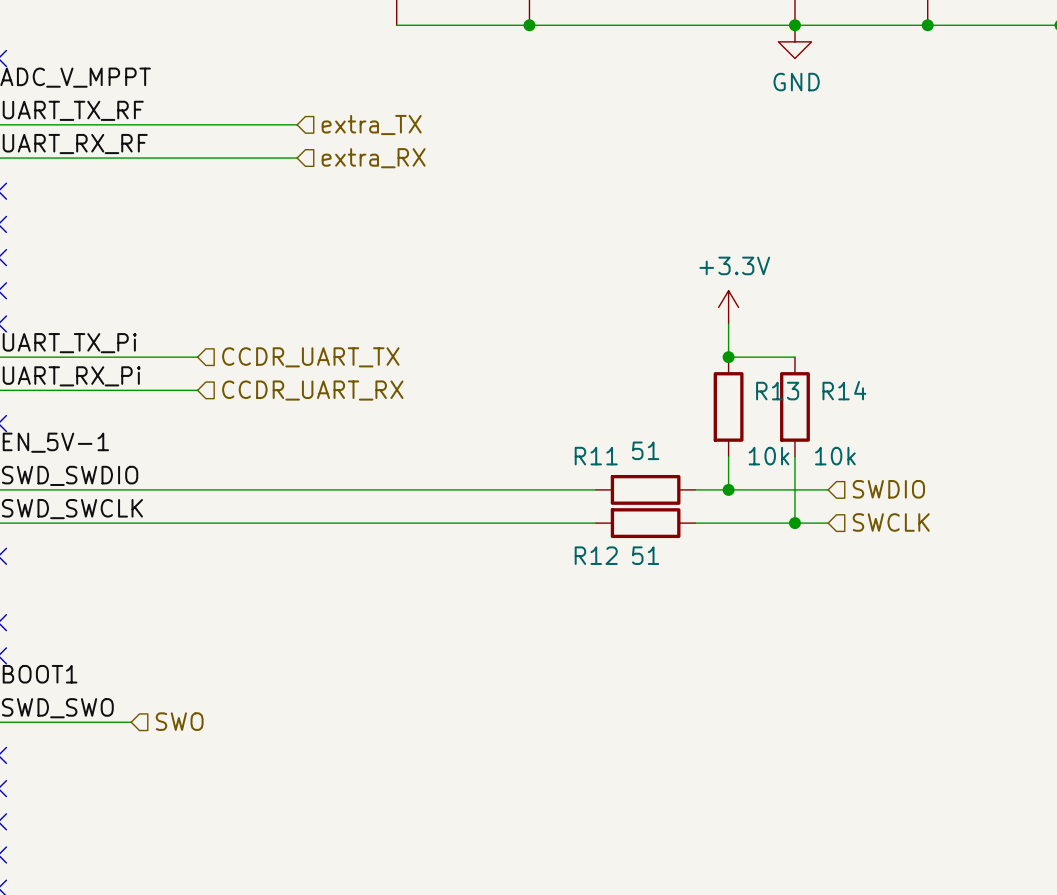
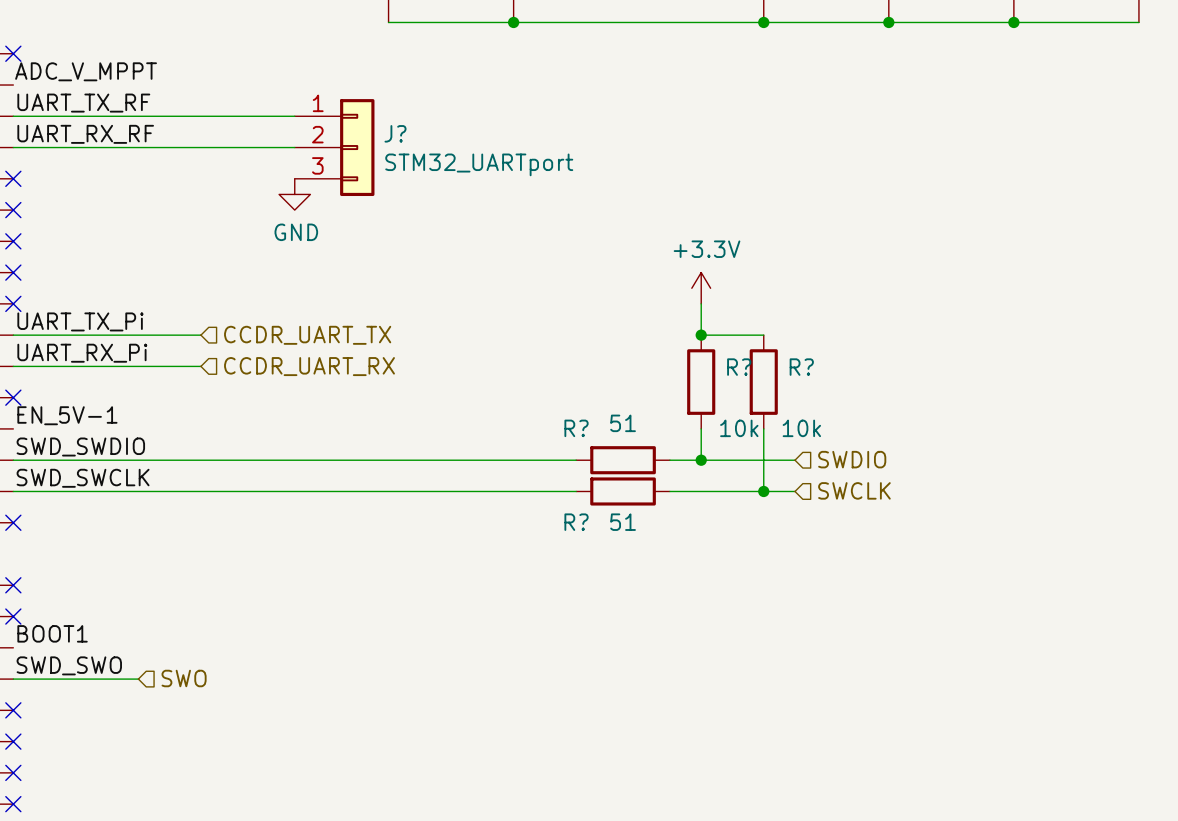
power symbol: GND (794, 41) -> none
hierarchical label: extra_TX (371, 125) -> none
J?: none -> STM32_UARTport (334, 147)
hierarchical label: extra_RX (373, 158) -> none
power symbol: none -> GND (294, 194)
R14 name: R14 (844, 390) -> R? (801, 367)
R13 name: R13 (777, 391) -> R? (739, 367)
R11 name: R11 (596, 456) -> R? (576, 428)
R12 name: R12 (596, 555) -> R? (576, 522)

